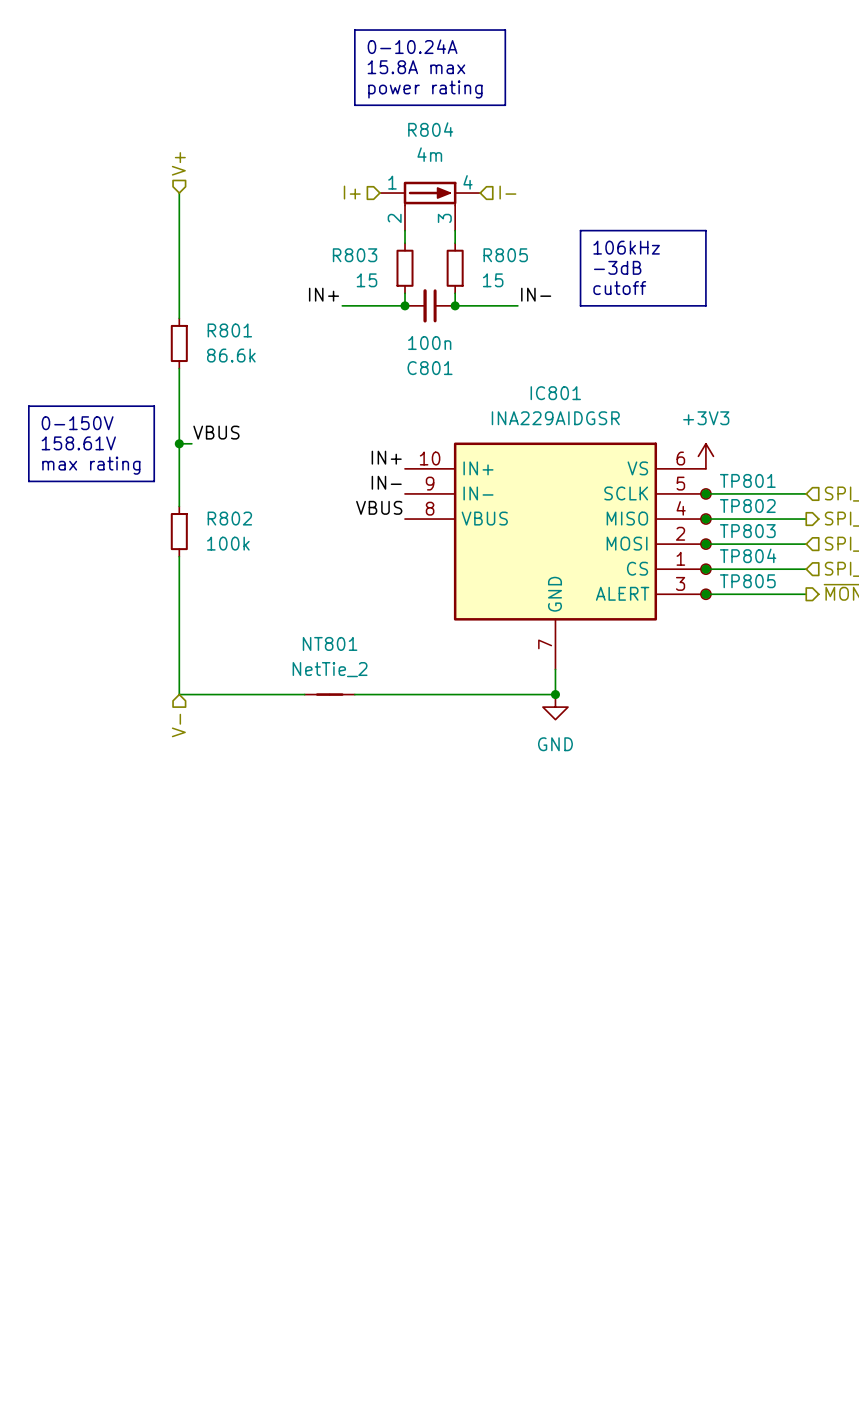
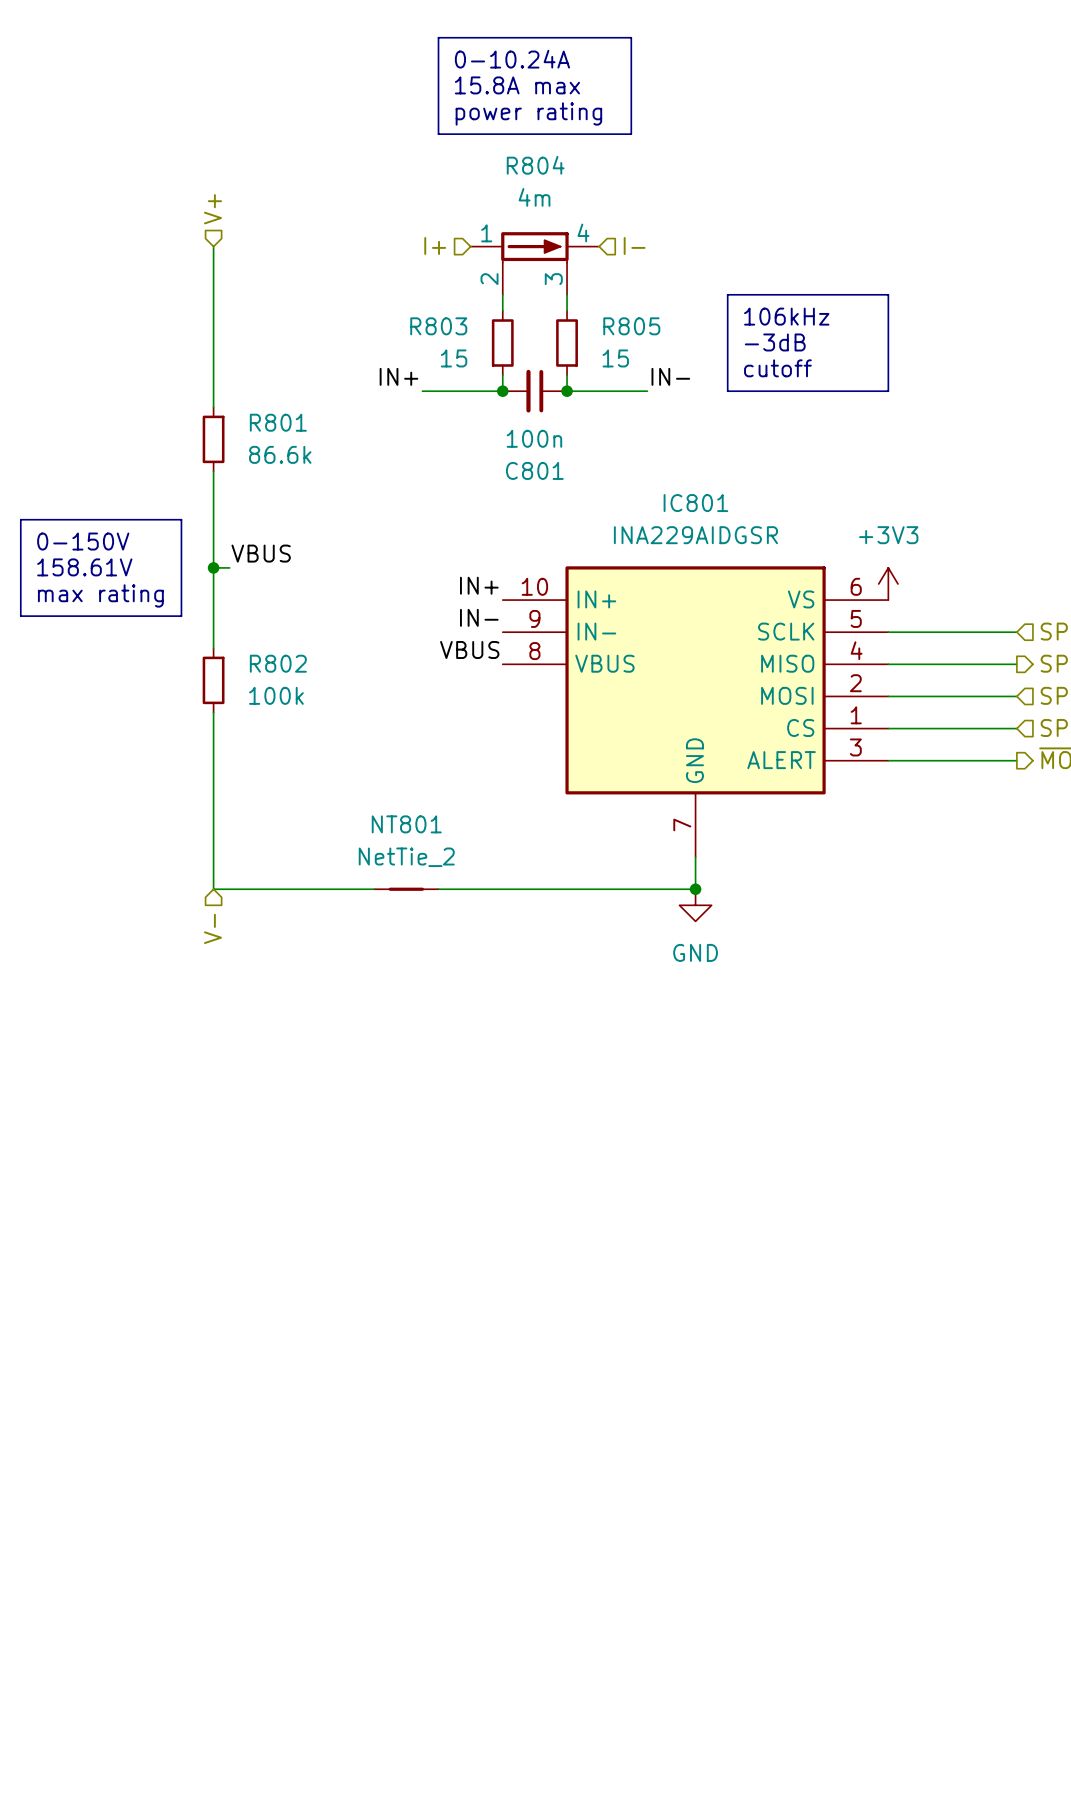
junction: (705, 493) -> none
TP801: (705, 493) -> none
junction: (705, 519) -> none
TP802: (705, 519) -> none
junction: (705, 544) -> none
TP803: (705, 544) -> none
junction: (705, 569) -> none
TP804: (705, 569) -> none
junction: (705, 594) -> none
TP805: (705, 594) -> none

